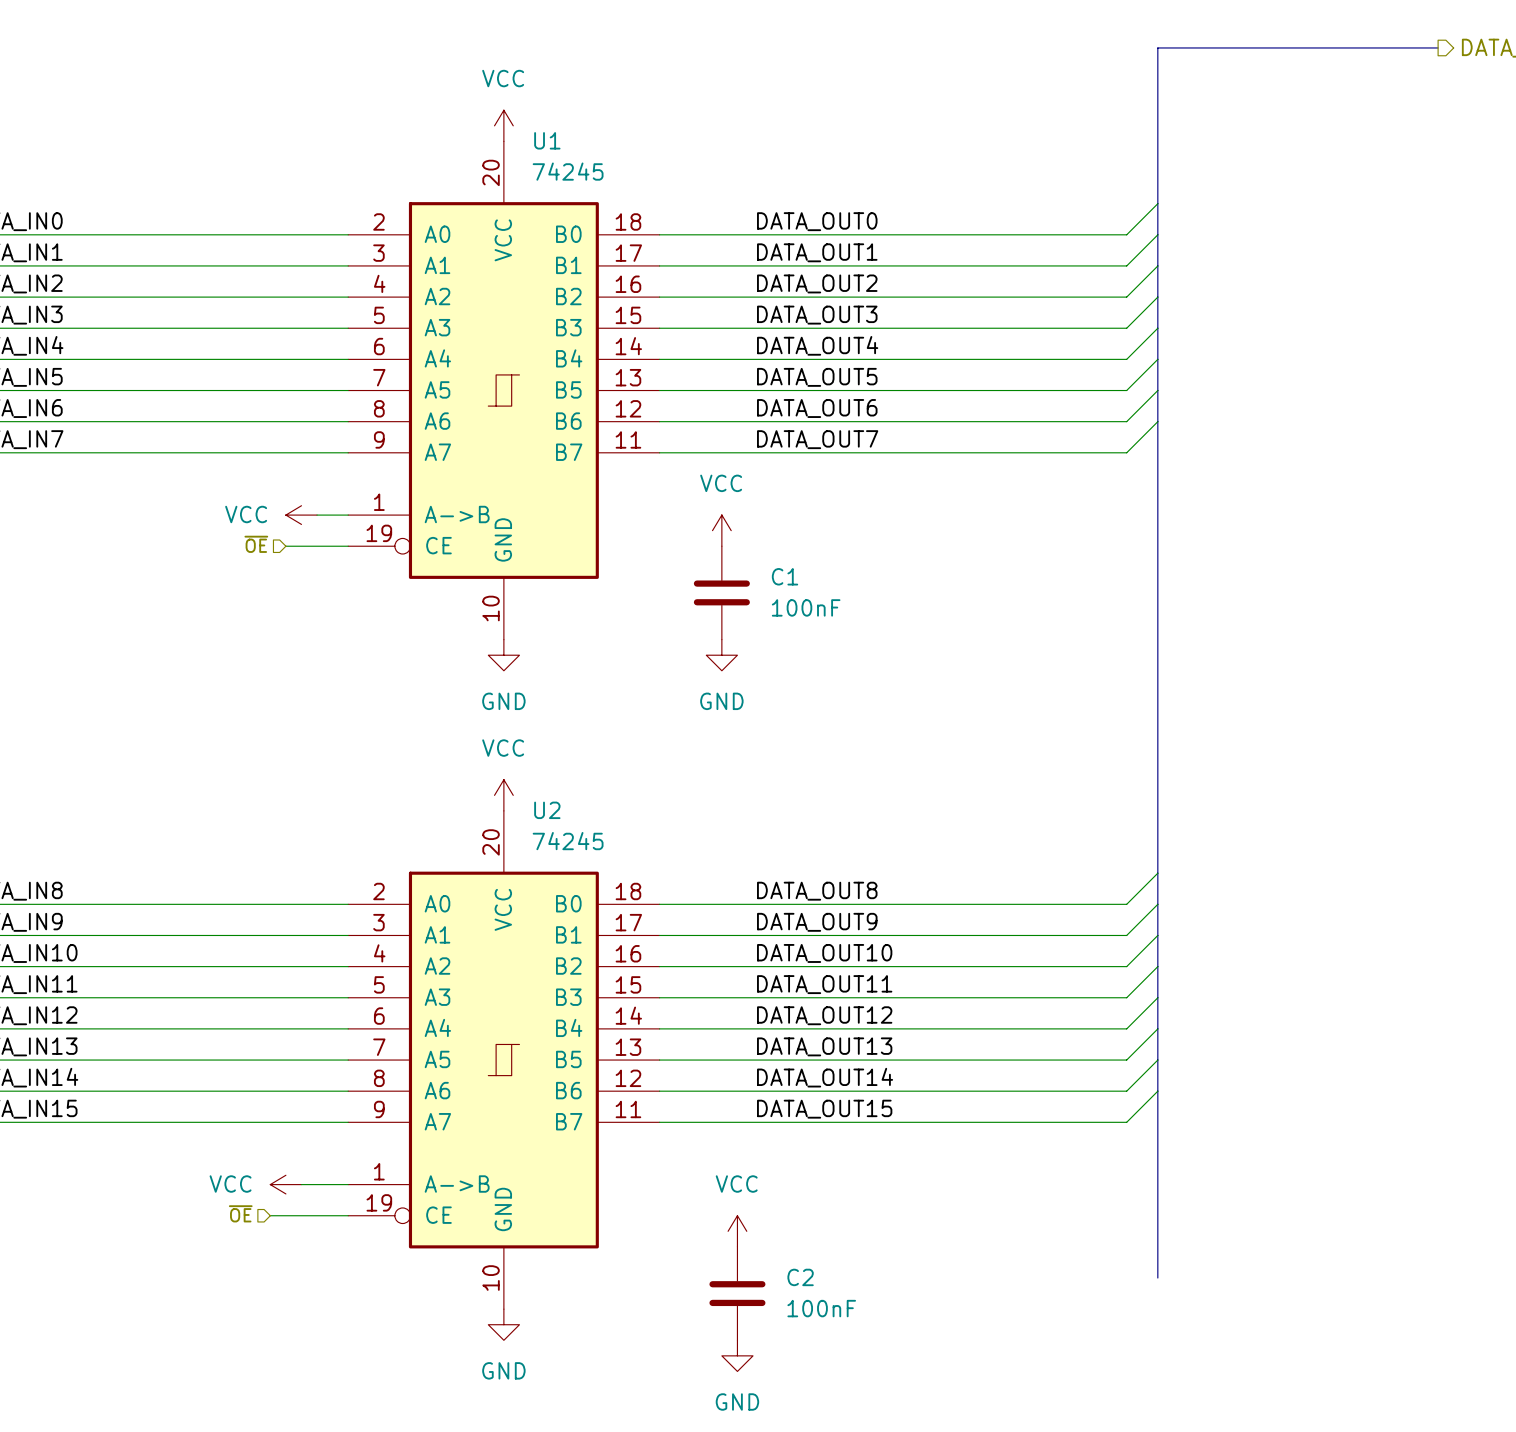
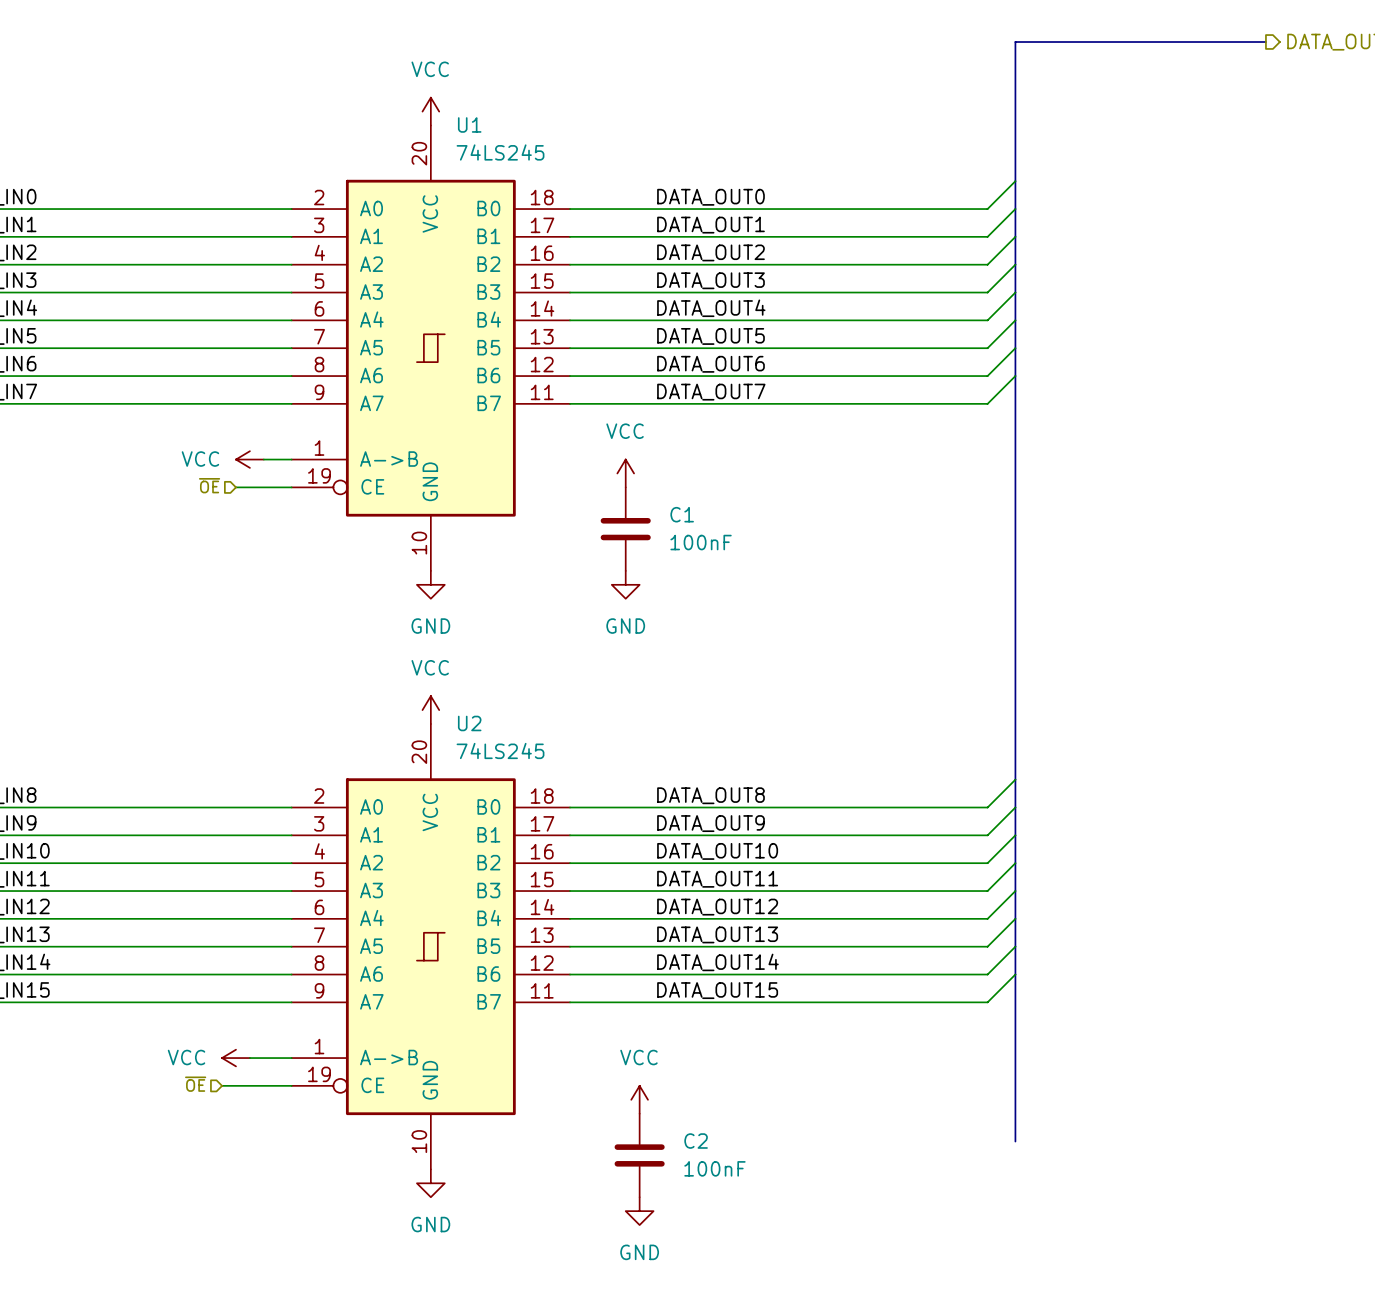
U1 value: 74245 (568, 171) -> 74LS245 (500, 152)
U2 value: 74245 (568, 841) -> 74LS245 (500, 750)

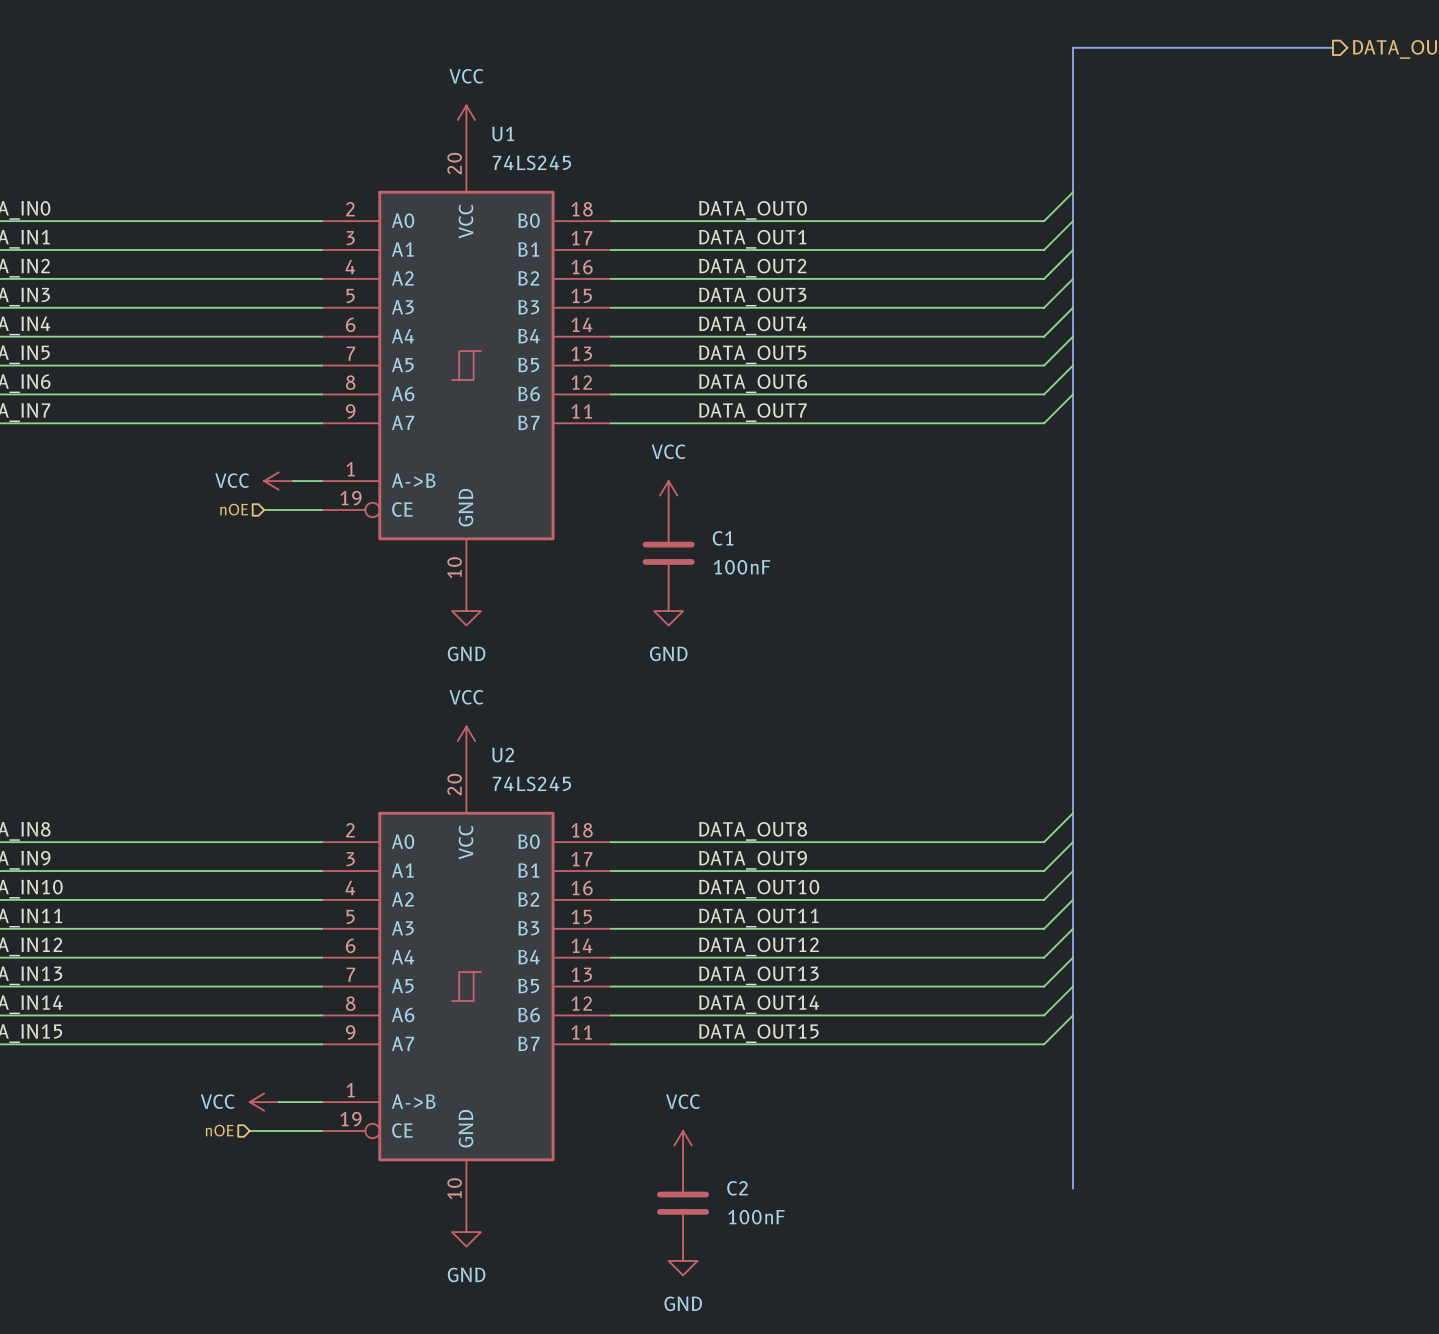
hierarchical label: ~{OE} (209, 485) -> nOE (234, 509)
hierarchical label: ~{OE} (195, 1084) -> nOE (219, 1130)

